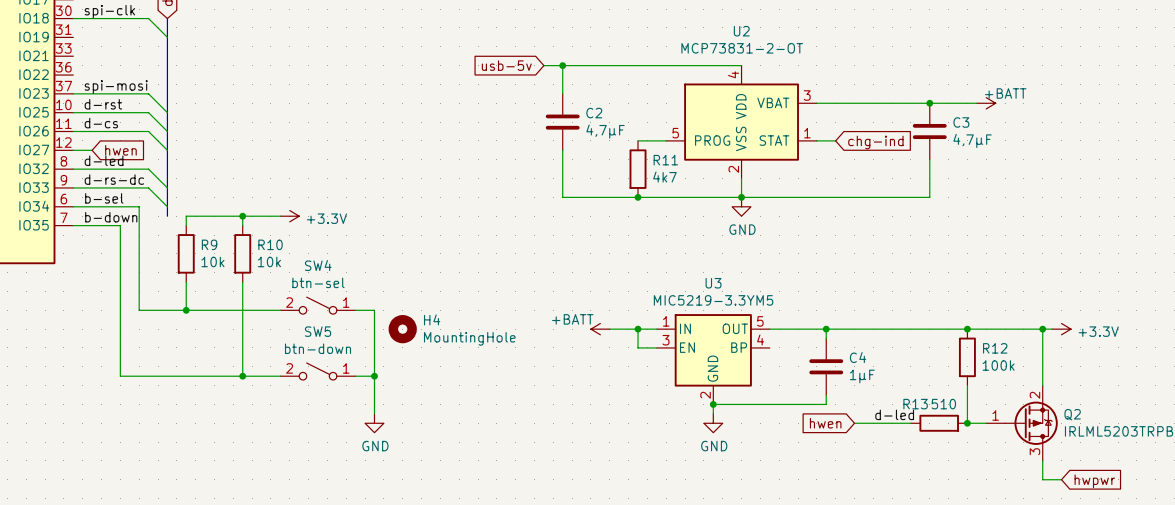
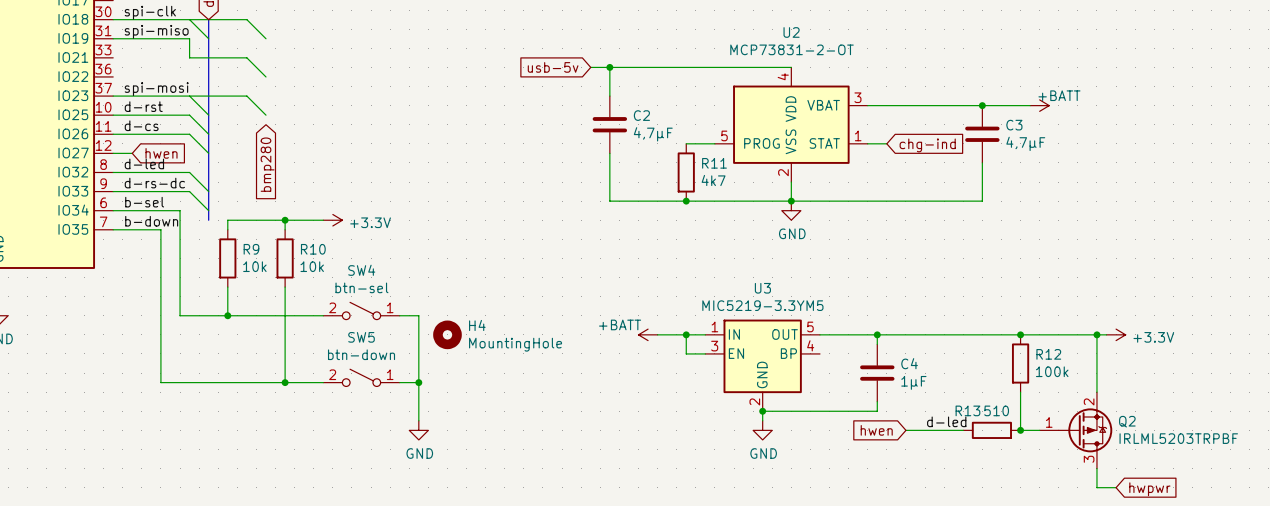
wire: none -> (189, 19) (246, 19) (266, 38)
label: none -> spi-miso (156, 31)
wire: none -> (113, 38) (189, 38) (189, 57) (246, 57) (266, 76)
wire: none -> (189, 96) (246, 96) (266, 115)
global label: none -> bmp280 (267, 164)

